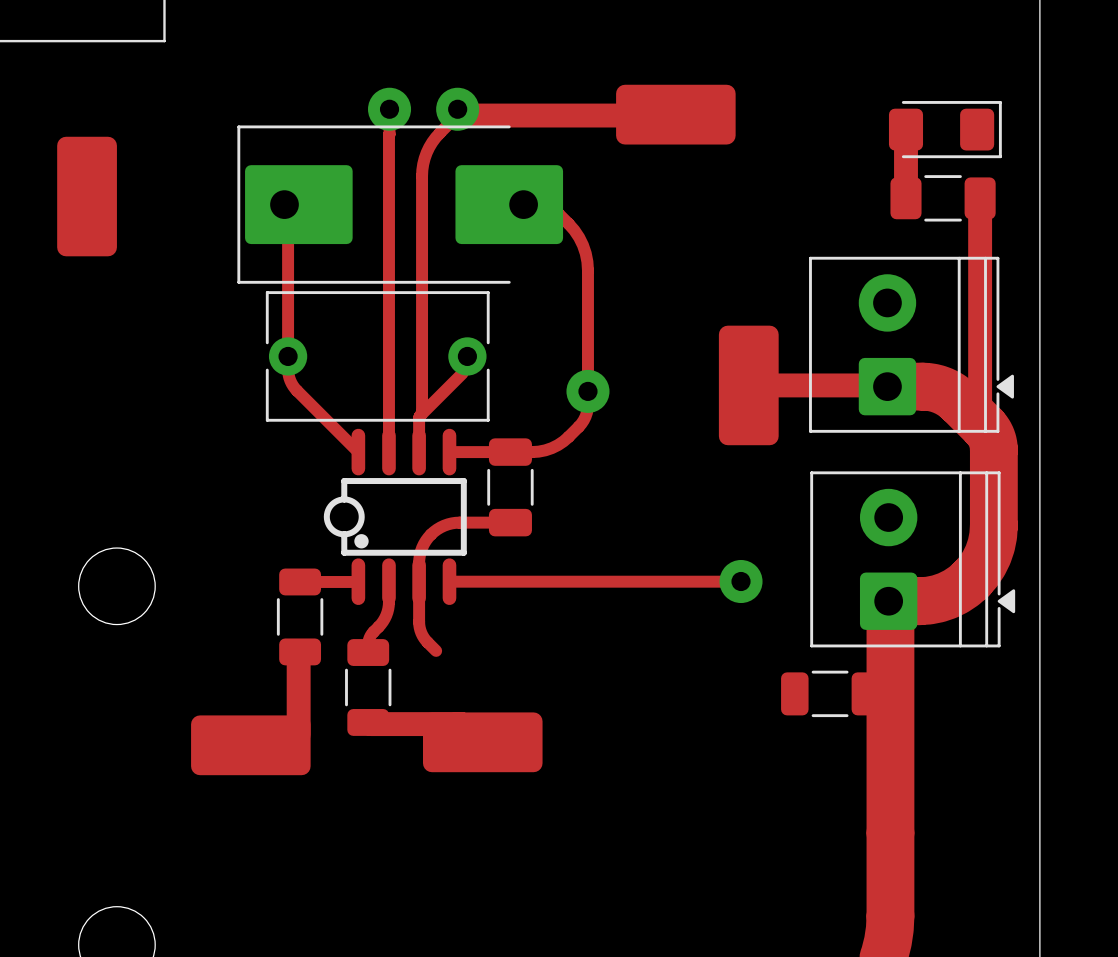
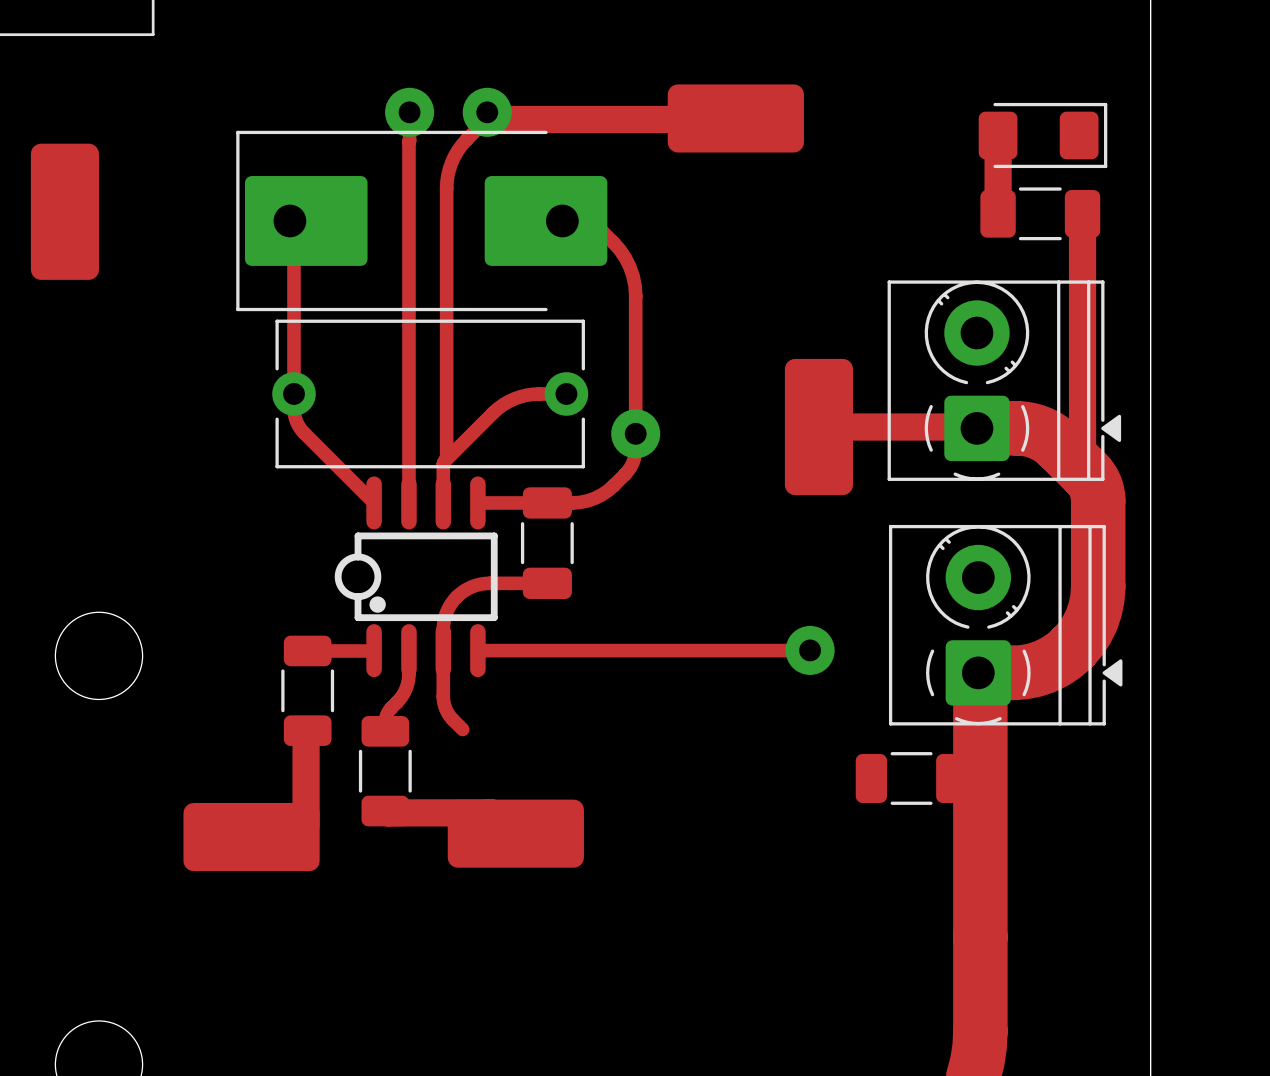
part footprint: [809, 256, 1014, 433] -> [887, 280, 1122, 481]
part: (377, 356) -> none
part: none -> (430, 393)
track: none -> (566, 393) (532, 394) (520, 396) (508, 401) (492, 413)
part footprint: [810, 471, 1016, 648] -> [888, 524, 1123, 726]

